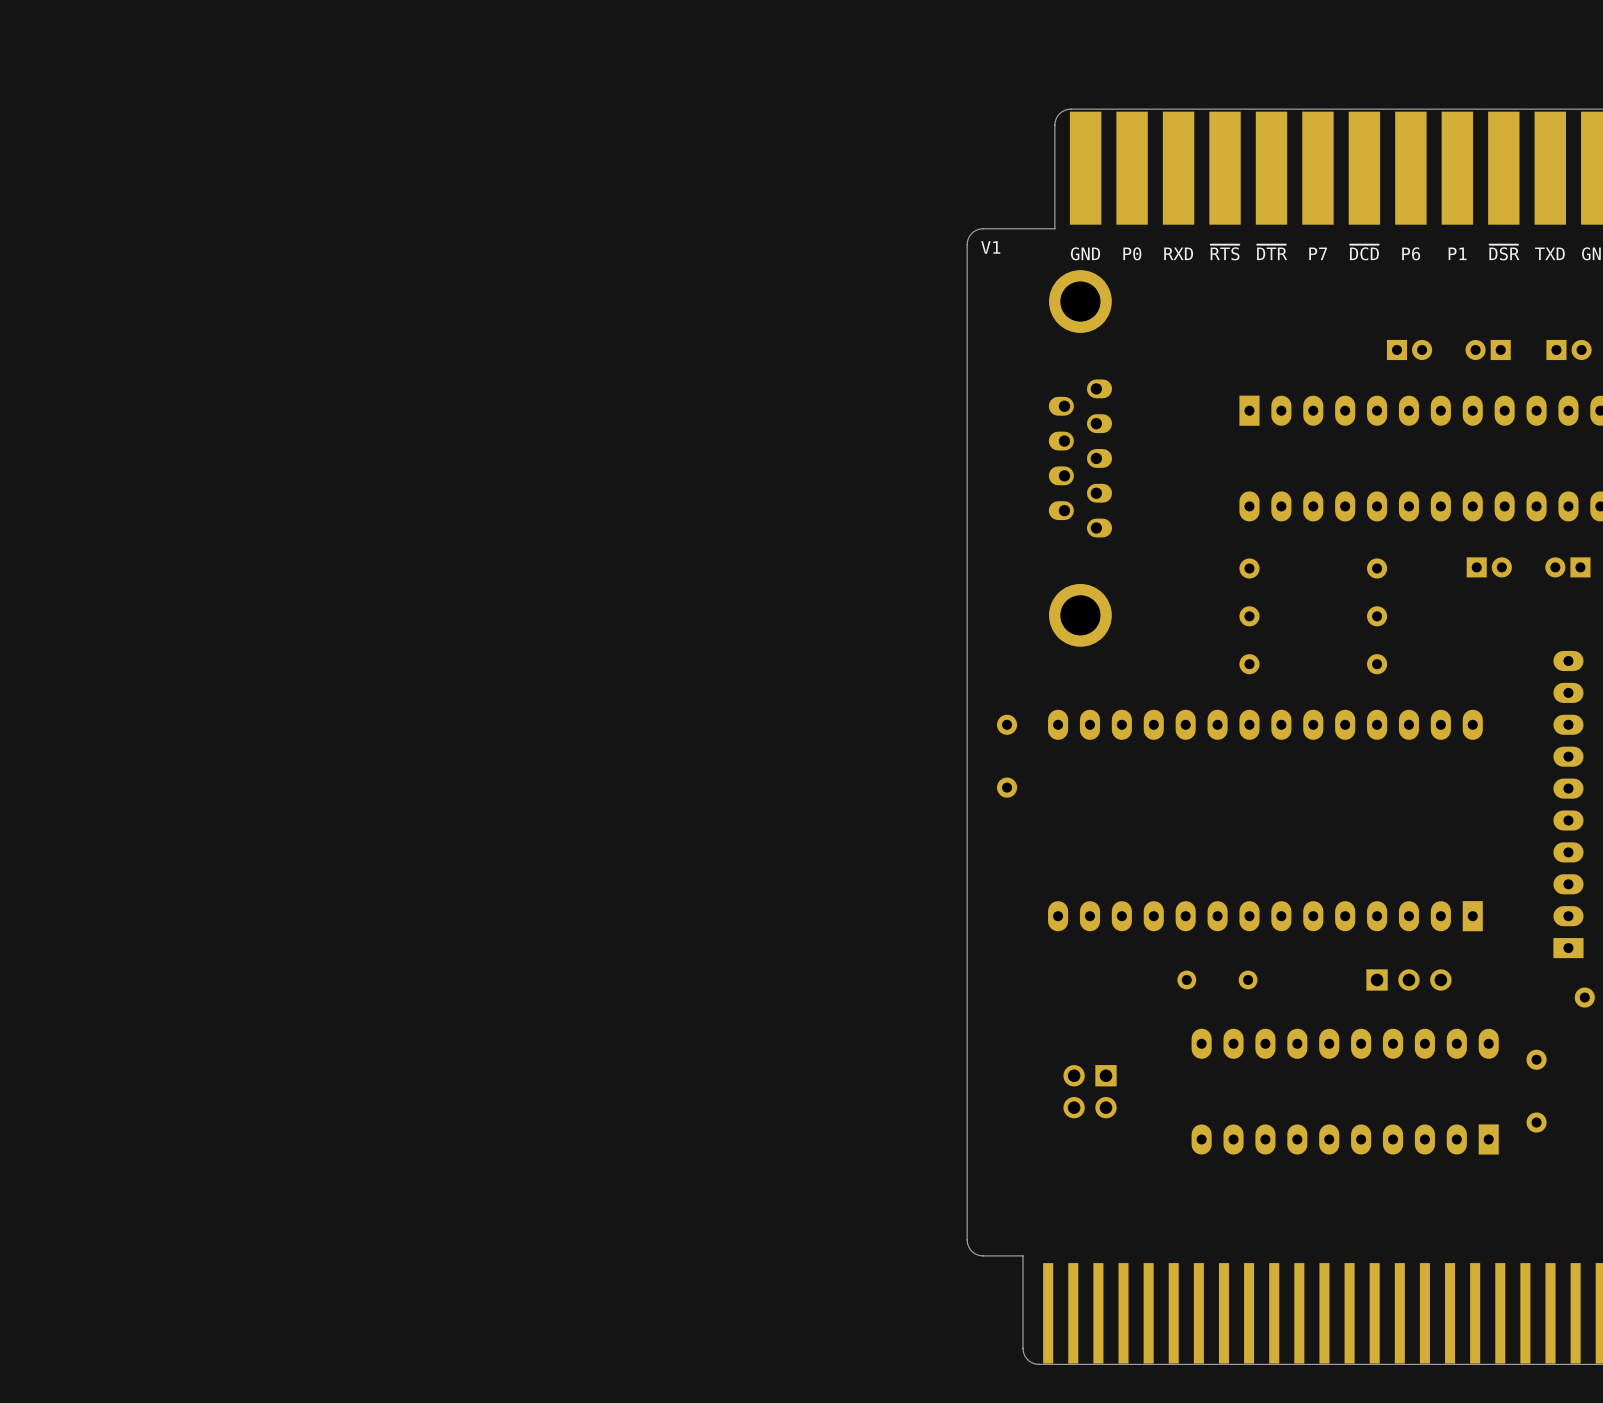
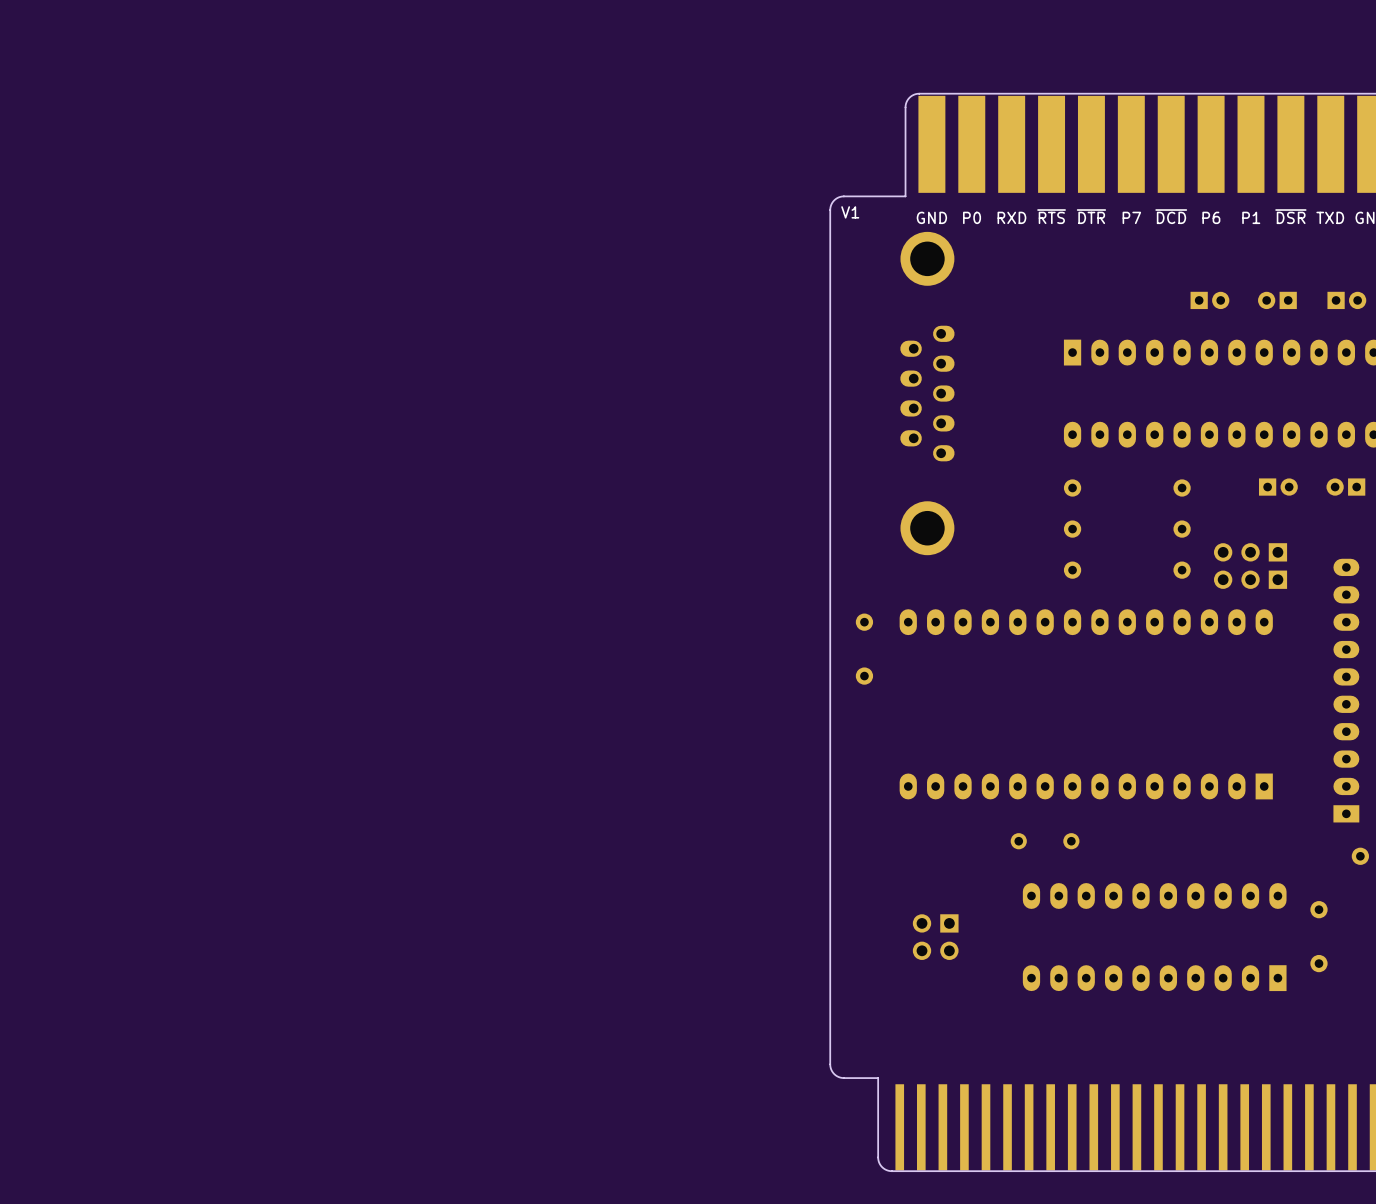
part: none -> (1250, 552)
part: none -> (1250, 579)
part: (1408, 979) -> none

